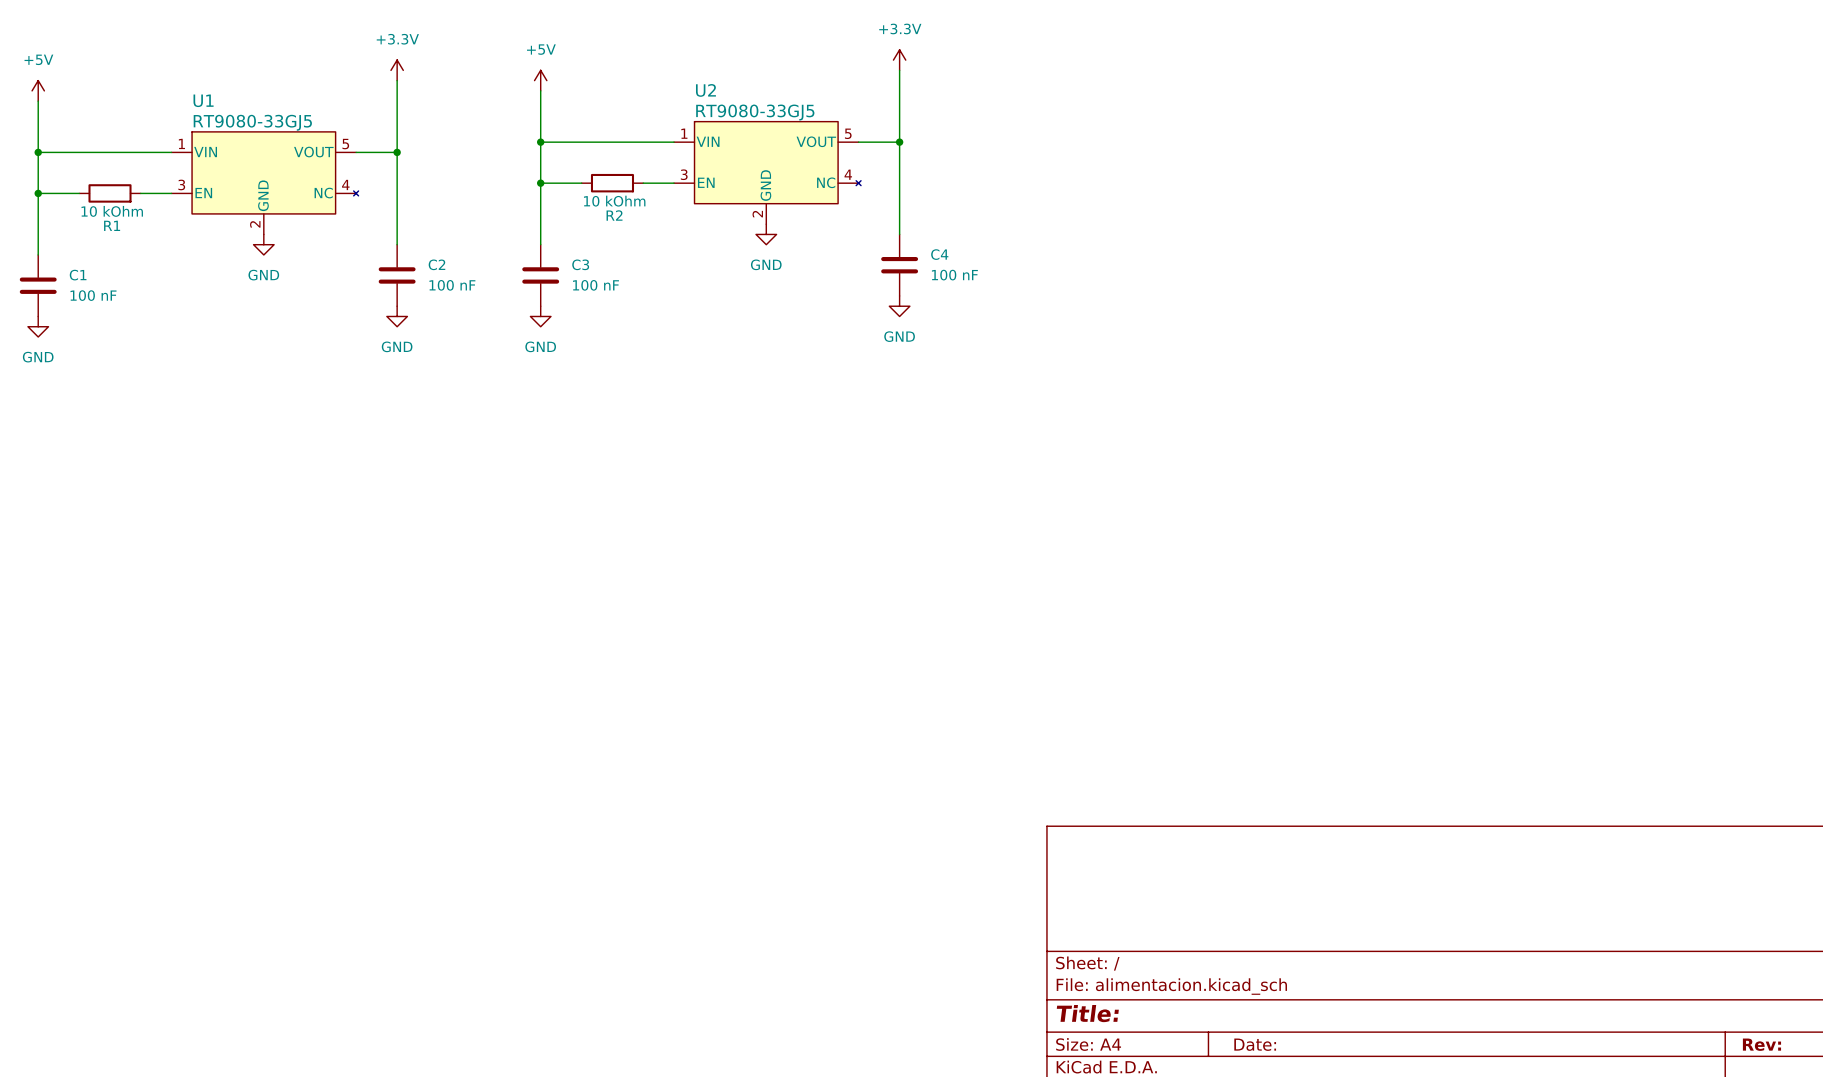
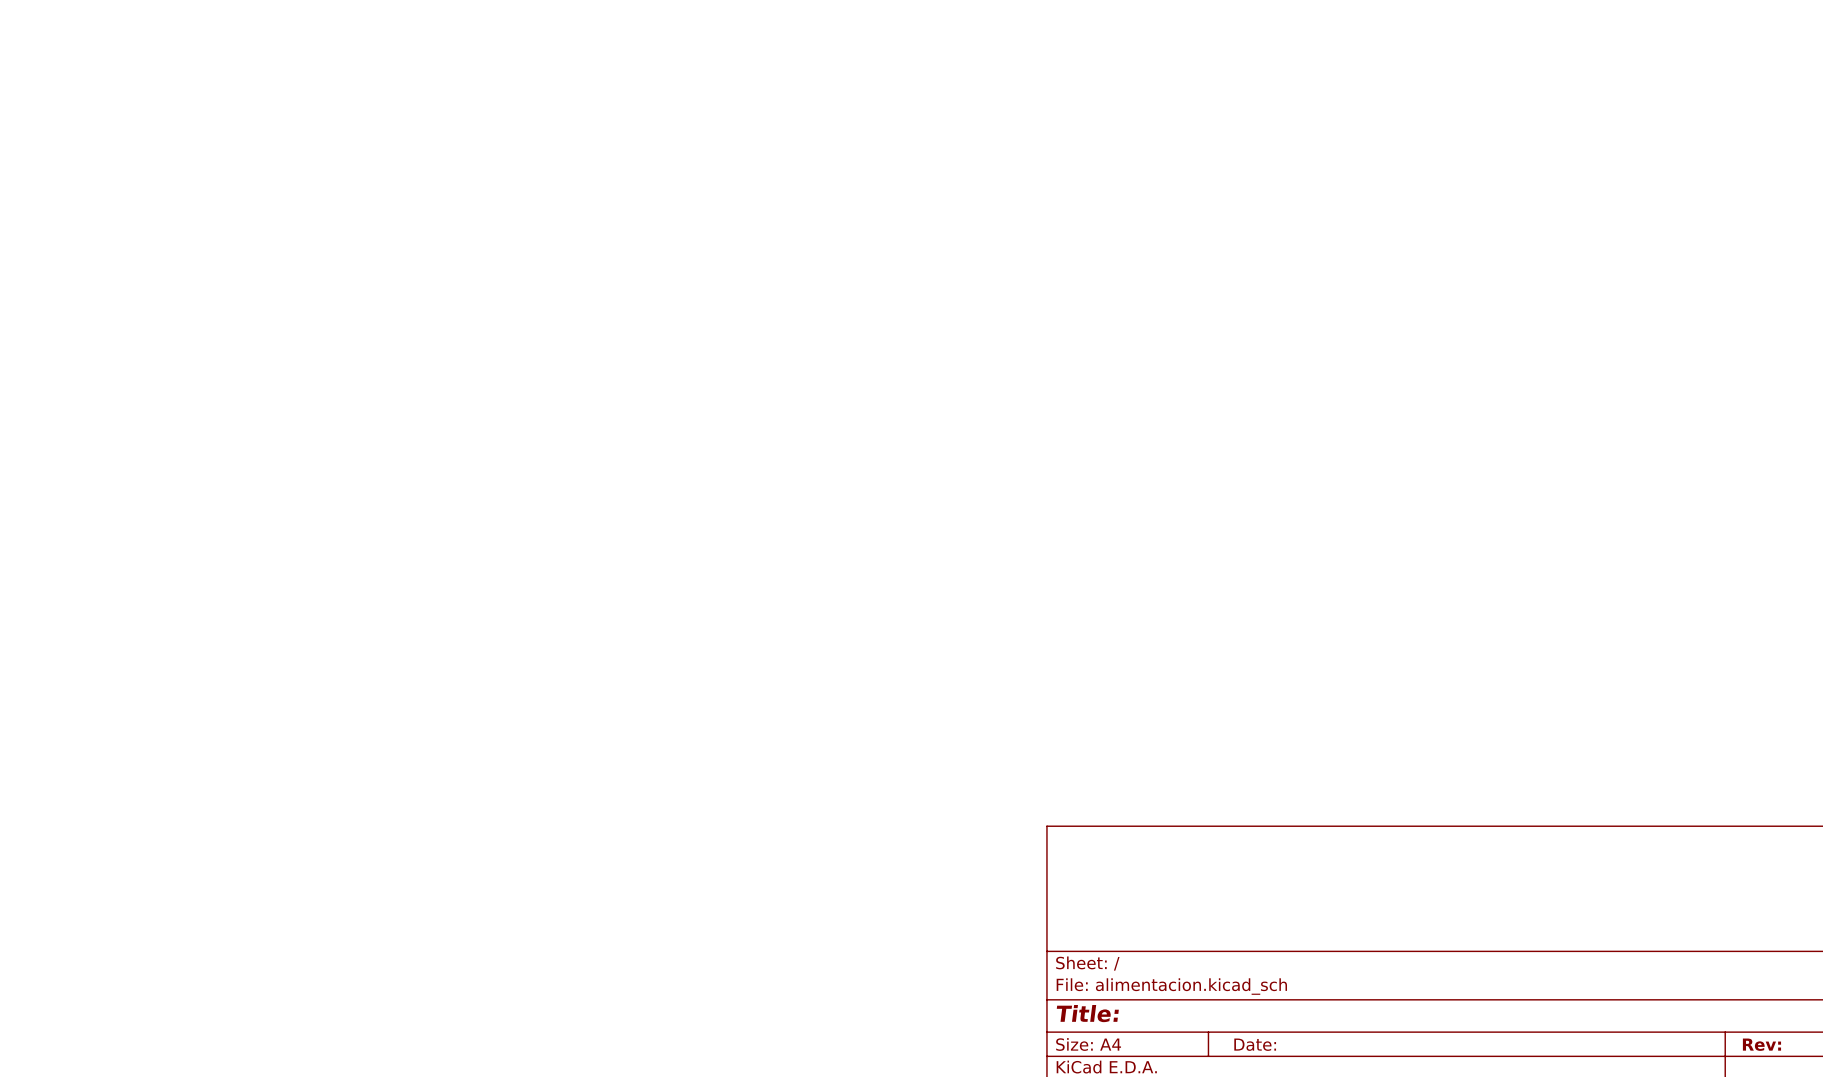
power symbol: +3.3V (899, 60) -> none
power symbol: +3.3V (397, 70) -> none
wire: (899, 70) (899, 234) -> none
wire: (397, 80) (397, 244) -> none
power symbol: +5V (540, 80) -> none
power symbol: +5V (38, 90) -> none
wire: (540, 90) (540, 244) -> none
wire: (38, 101) (38, 254) -> none
wire: (540, 142) (674, 142) -> none
junction: (540, 142) -> none
wire: (858, 142) (899, 142) -> none
junction: (899, 142) -> none
wire: (38, 152) (171, 152) -> none
junction: (38, 152) -> none
wire: (356, 152) (397, 152) -> none
junction: (397, 152) -> none
U2: RT9080-33GJ5 (767, 172) -> none
U1: RT9080-33GJ5 (265, 183) -> none
wire: (540, 183) (581, 183) -> none
junction: (540, 183) -> none
R2: 10 kOhm (612, 183) -> none
wire: (643, 183) (674, 183) -> none
wire: (38, 193) (79, 193) -> none
junction: (38, 193) -> none
R1: 10 kOhm (110, 193) -> none
wire: (140, 193) (171, 193) -> none
power symbol: GND (766, 234) -> none
power symbol: GND (263, 244) -> none
C4: 100 nF (899, 265) -> none
C2: 100 nF (397, 275) -> none
C3: 100 nF (540, 275) -> none
C1: 100 nF (38, 285) -> none
power symbol: GND (899, 306) -> none
power symbol: GND (397, 316) -> none
power symbol: GND (540, 316) -> none
power symbol: GND (38, 326) -> none

